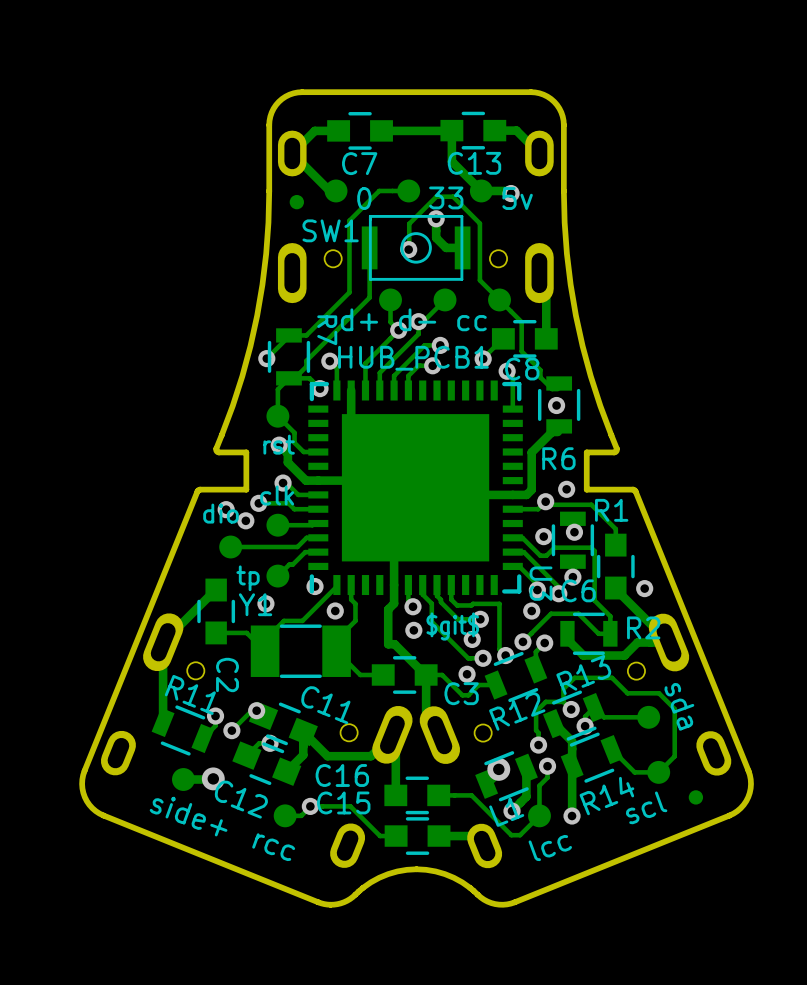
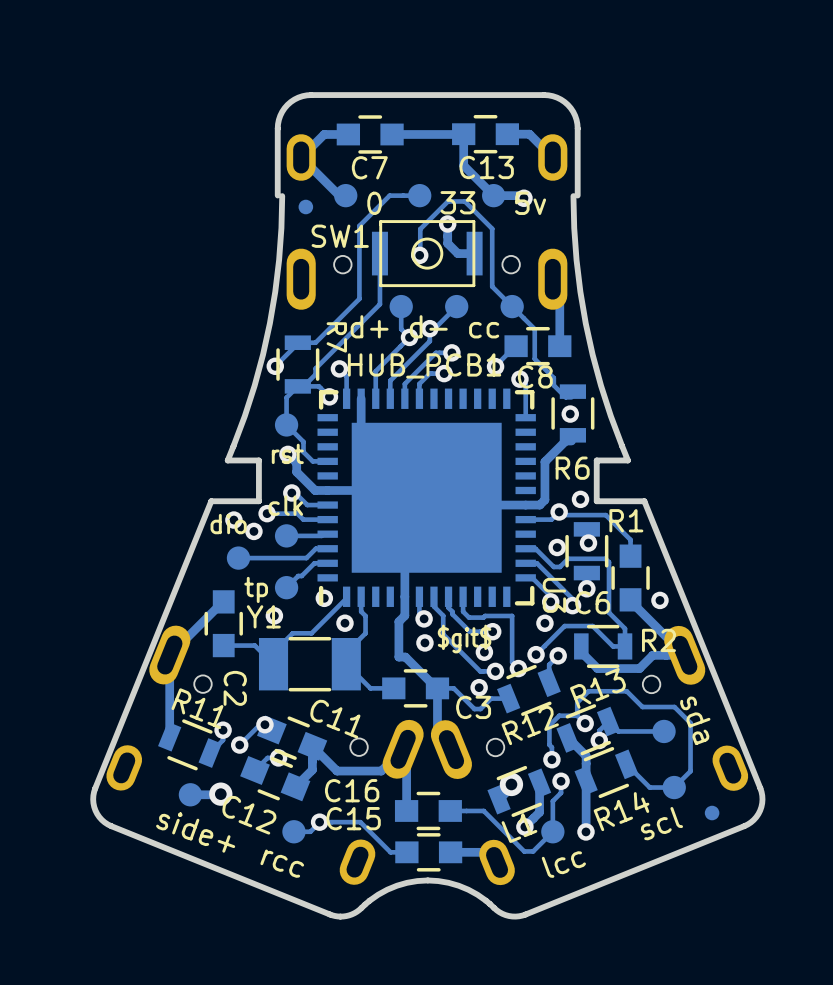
board edge: none -> (573, 196) (576, 260) (585, 323) (601, 385) (627, 460) (596, 460) (596, 501) (644, 501) (760, 788) (761, 806) (753, 819) (744, 826) (522, 915) (512, 916) (502, 913) (477, 894) (458, 885) (427, 880) (407, 882) (387, 889) (354, 913) (340, 916) (329, 914) (111, 826) (99, 817) (93, 803) (95, 788) (211, 501) (258, 501) (258, 460) (227, 460) (254, 385) (269, 323) (279, 260) (282, 196)
board edge: (563, 191) (566, 253) (575, 315) (590, 376) (616, 449) (614, 452) (586, 452) (586, 489) (635, 491) (748, 770) (751, 784) (749, 792) (740, 808) (729, 815) (511, 903) (491, 903) (453, 877) (435, 871) (416, 869) (397, 871) (379, 877) (347, 900) (330, 904) (318, 902) (103, 815) (89, 804) (82, 788) (84, 770) (197, 491) (246, 489) (246, 452) (218, 452) (216, 449) (242, 376) (257, 315) (266, 253) (269, 191) -> none

